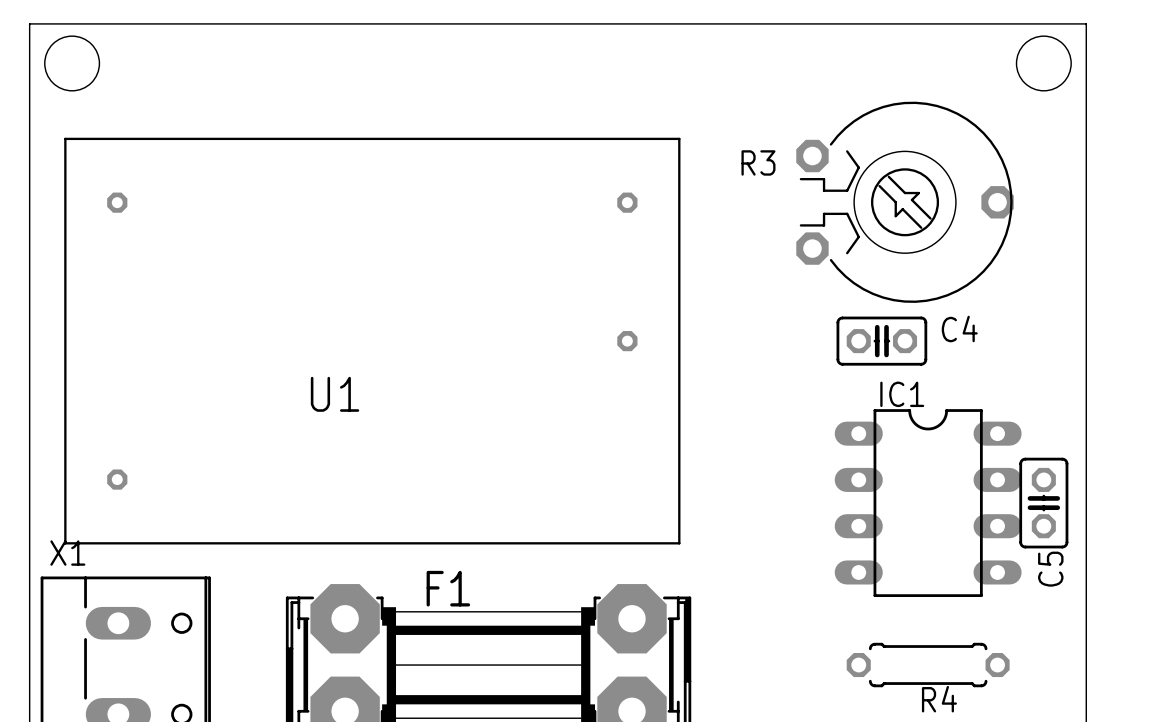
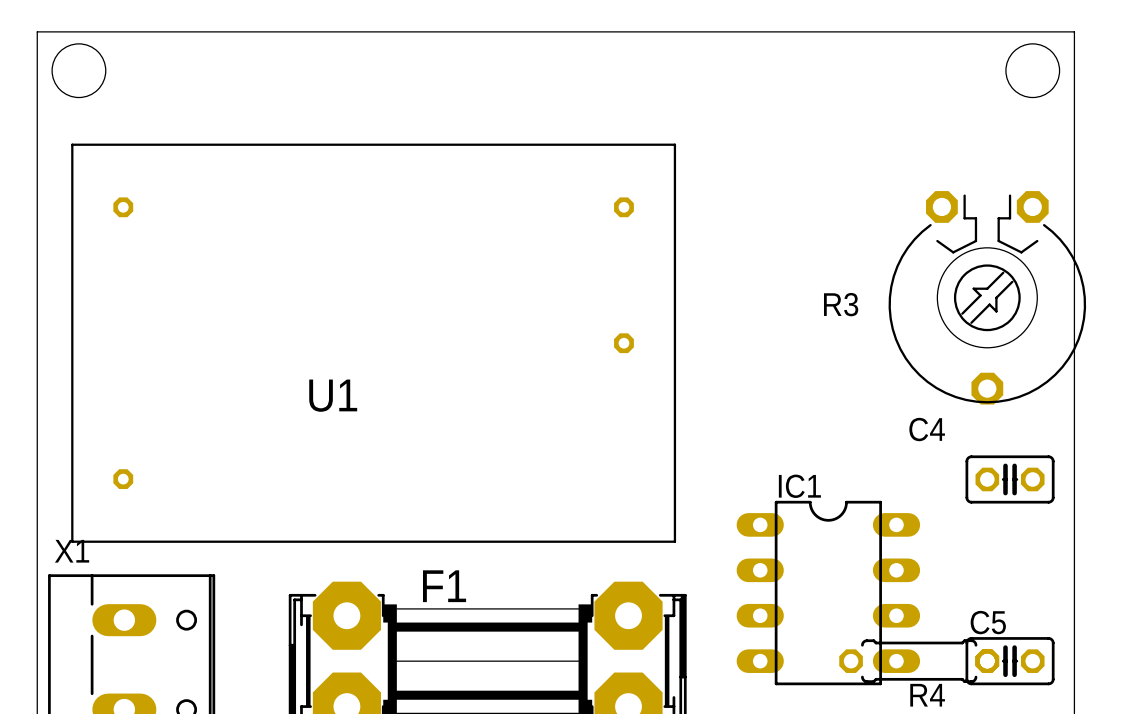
R3 name position: R3 (758, 162) -> R3 (841, 304)
R3 rotation: 0° (905, 202) -> 90° clockwise (987, 297)
R3 position: (905, 202) -> (987, 297)
C4 name position: C4 (959, 328) -> C4 (927, 429)
C4 position: (881, 341) -> (1010, 479)
IC1 position: (928, 503) -> (828, 593)
C5 rotation: 0° (1043, 503) -> 90° clockwise (1010, 661)
C5 position: (1043, 503) -> (1010, 661)
C5 name position: C5 (1050, 569) -> C5 (988, 622)

